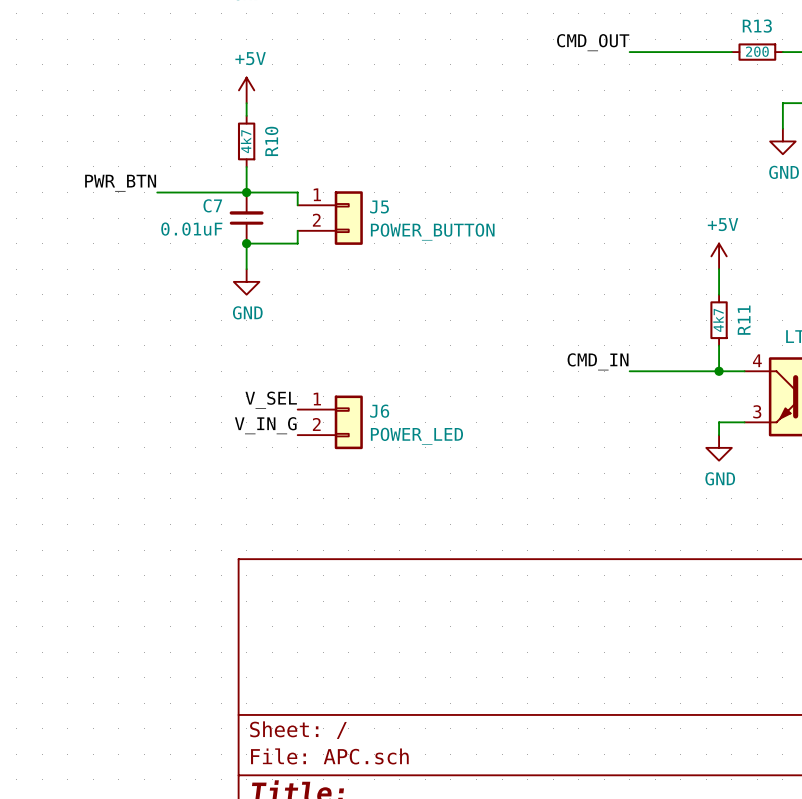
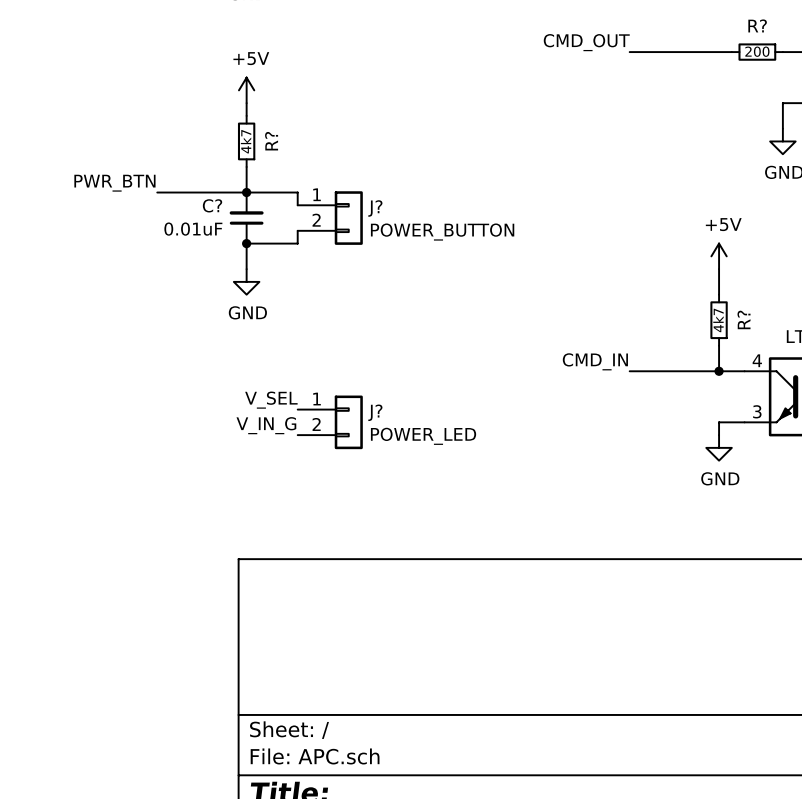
R13 name: R13 (757, 26) -> R? (757, 25)
R10 name: R10 (271, 141) -> R? (271, 141)
C7 name: C7 (212, 205) -> C? (212, 205)
J5 name: J5 (379, 206) -> J? (375, 208)
R11 name: R11 (744, 320) -> R? (744, 319)
J6 name: J6 (379, 411) -> J? (375, 412)

